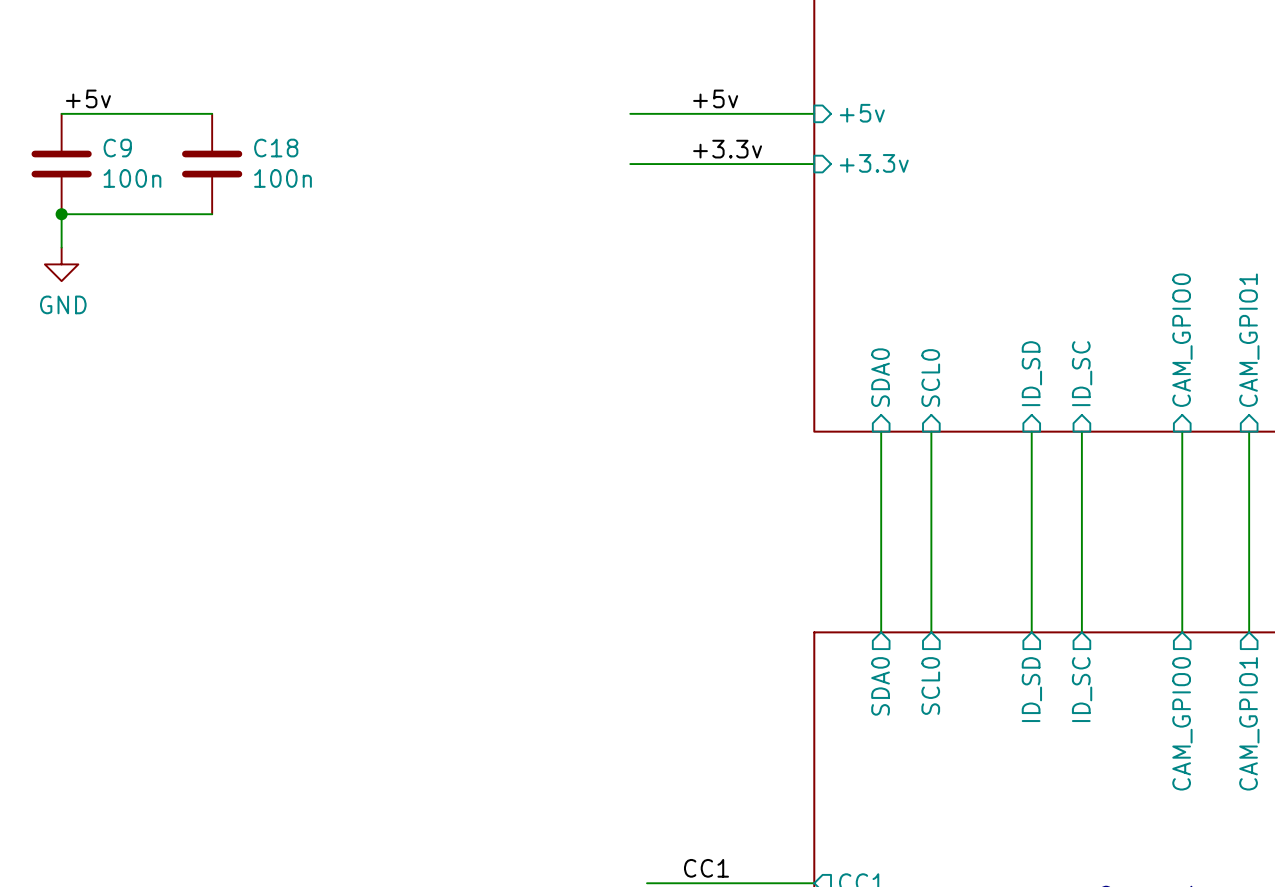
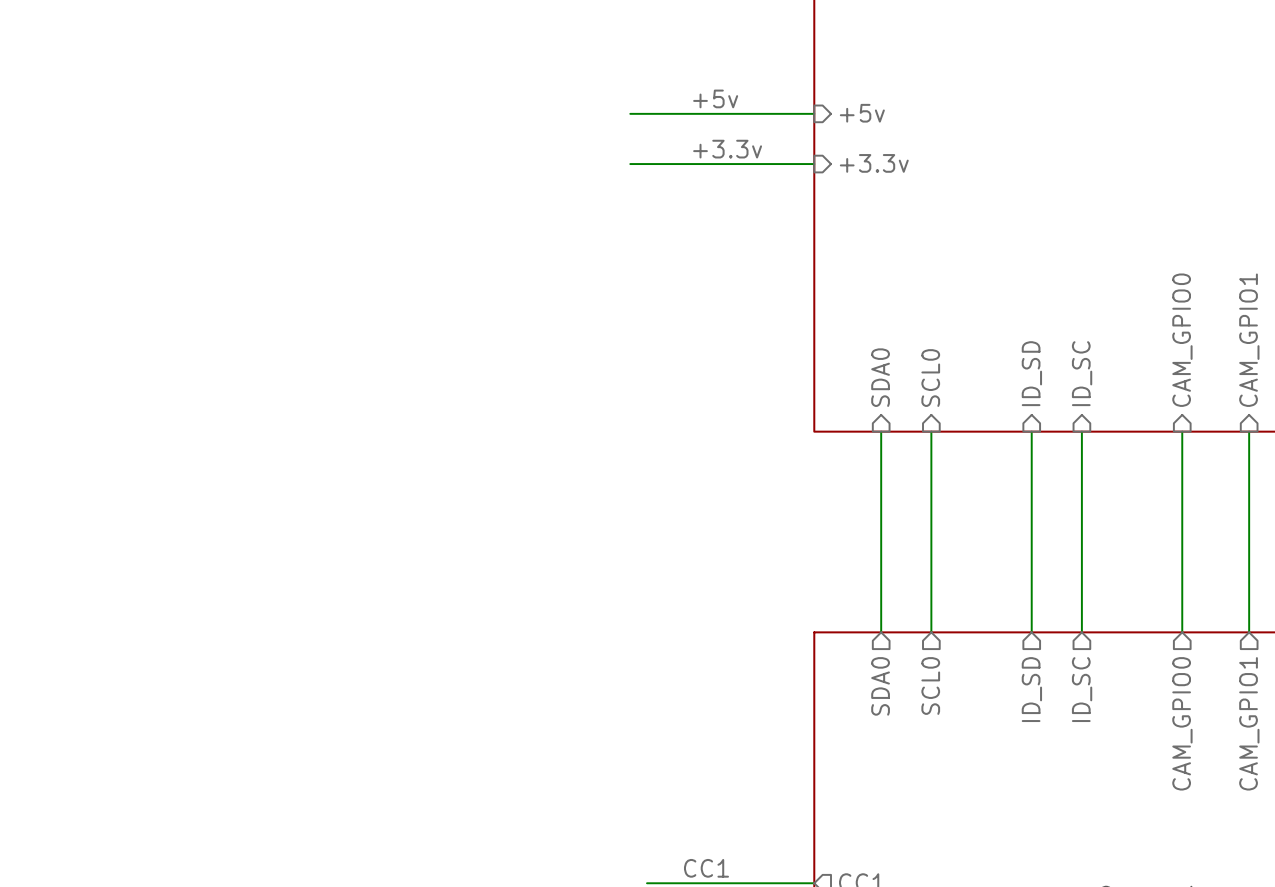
label: +5v (88, 98) -> none
wire: (61, 113) (212, 113) -> none
C9: 100n (61, 164) -> none
C18: 100n (212, 164) -> none
junction: (61, 214) -> none
wire: (212, 214) (61, 214) (61, 247) -> none
power symbol: GND (61, 264) -> none

